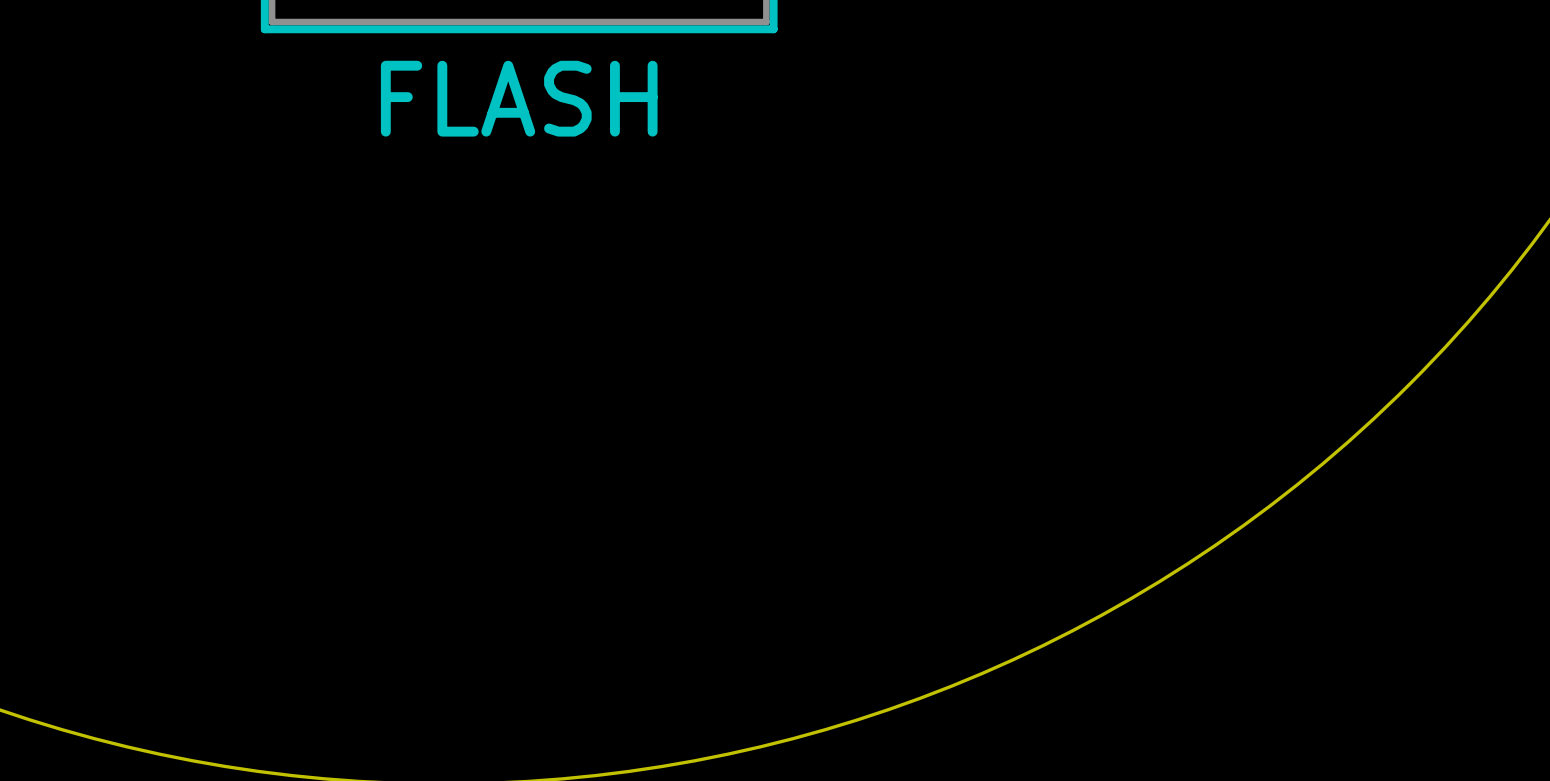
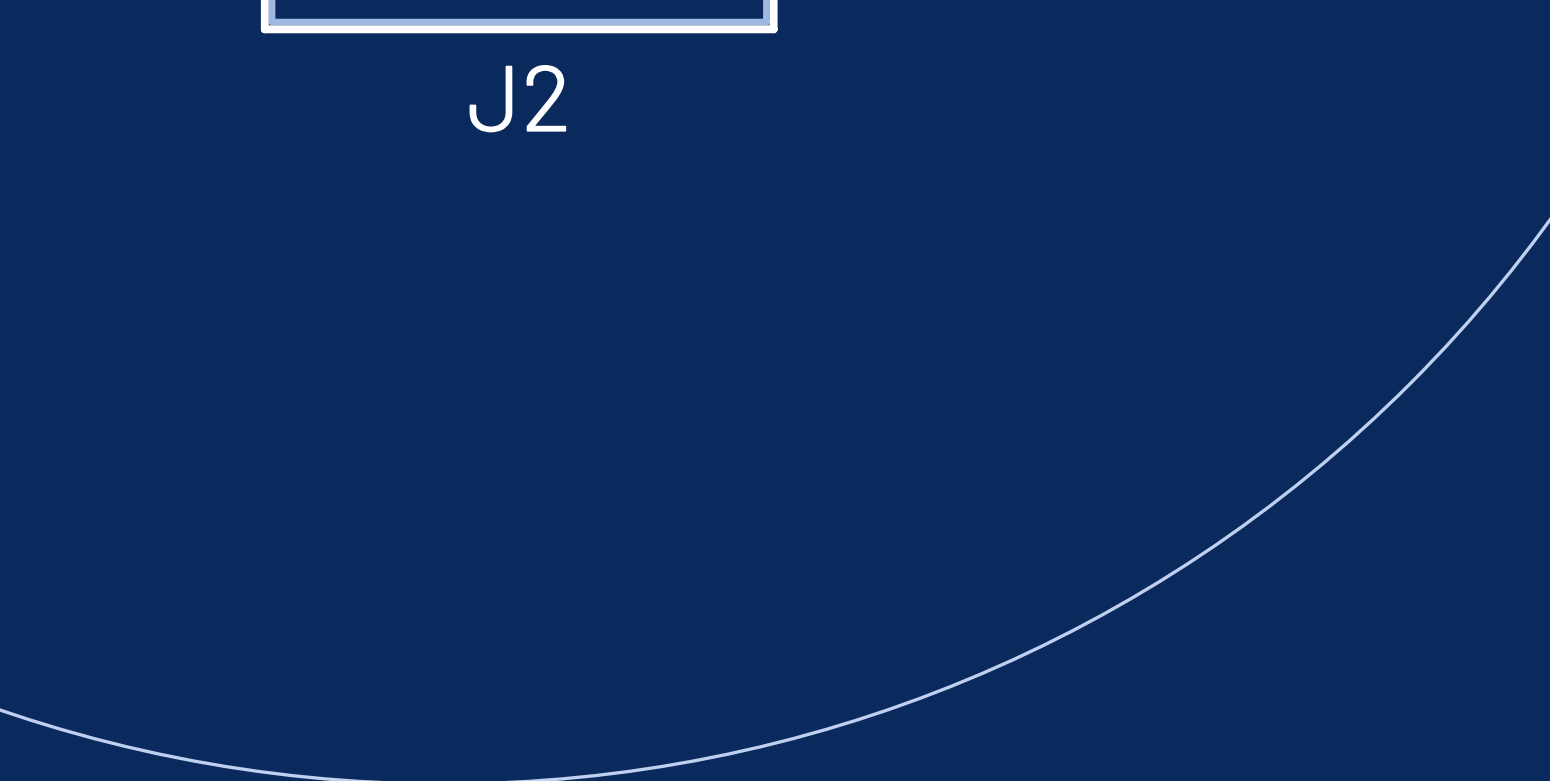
FLASH name: FLASH (519, 98) -> J2 (517, 98)

